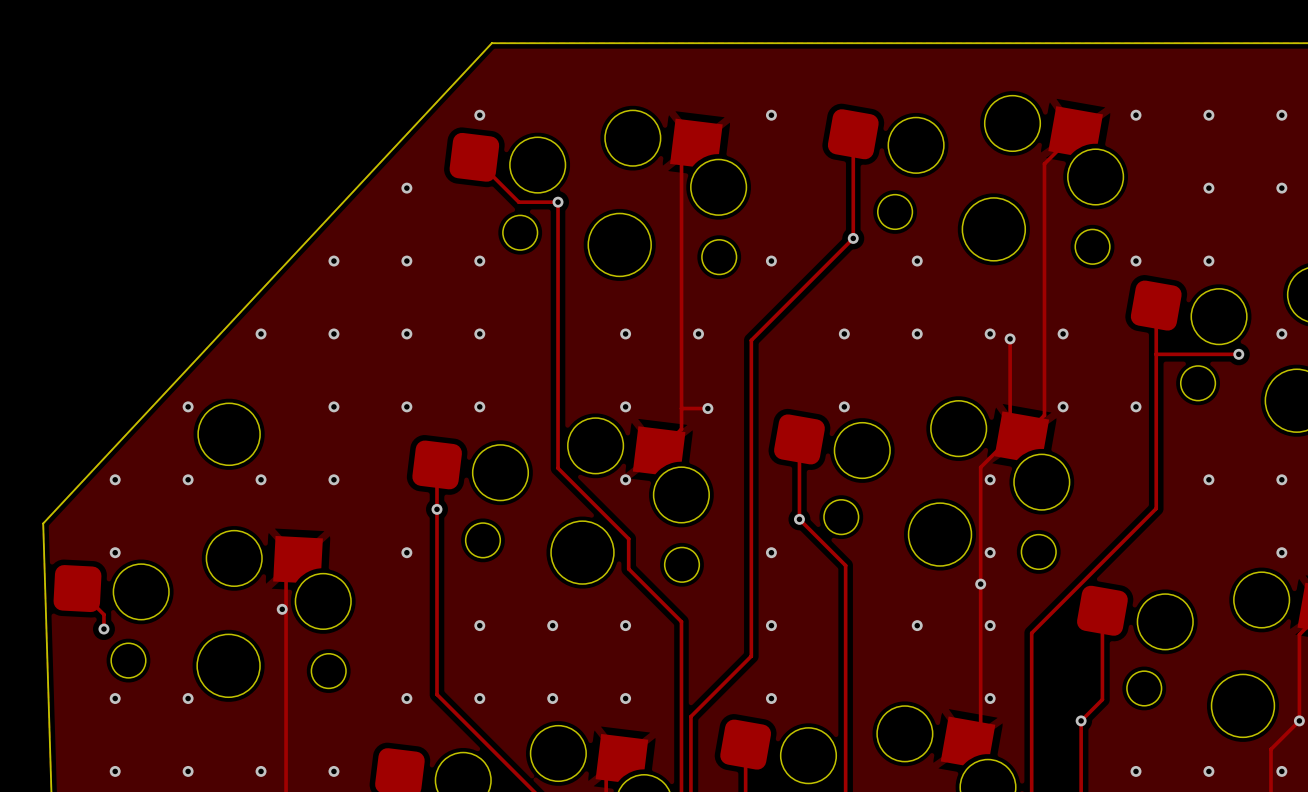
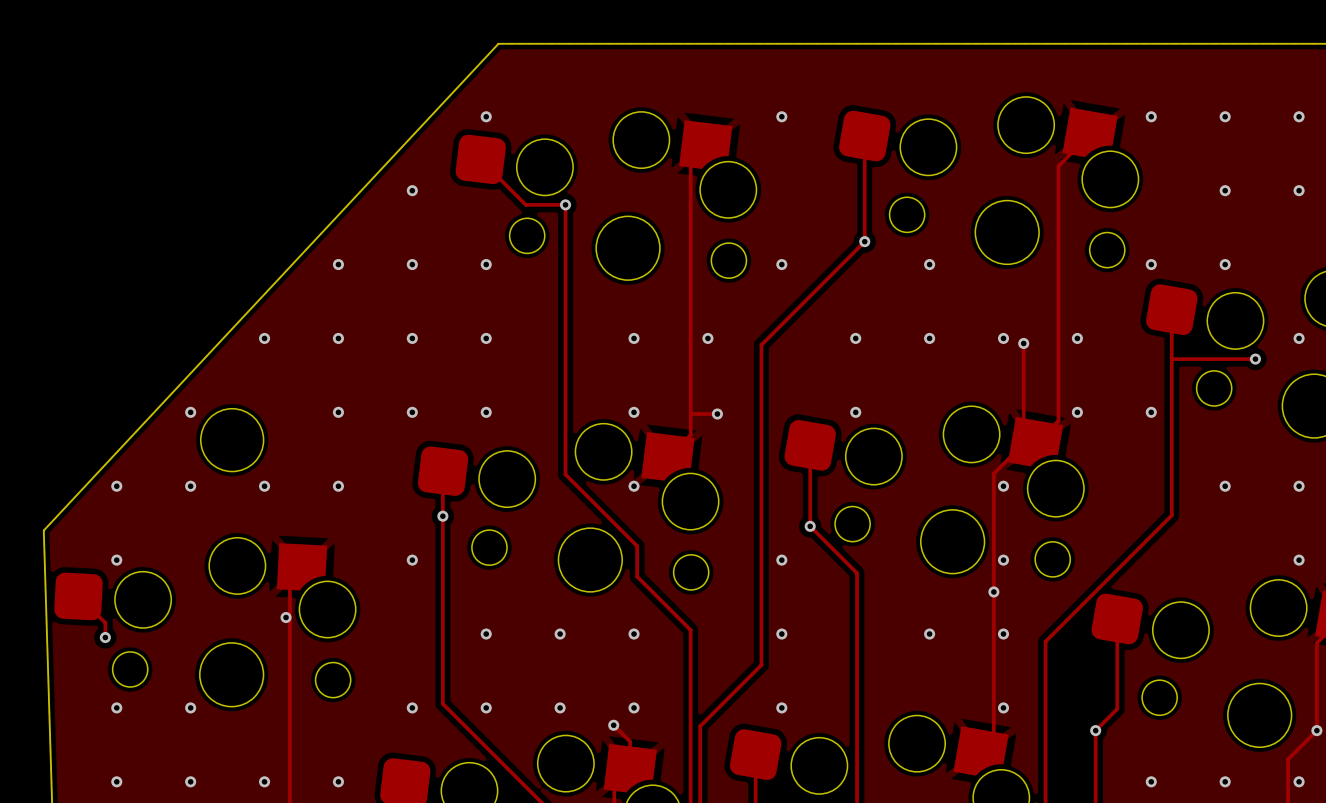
track: none -> (613, 725) (630, 741) (630, 769)
via: none -> (613, 725)

